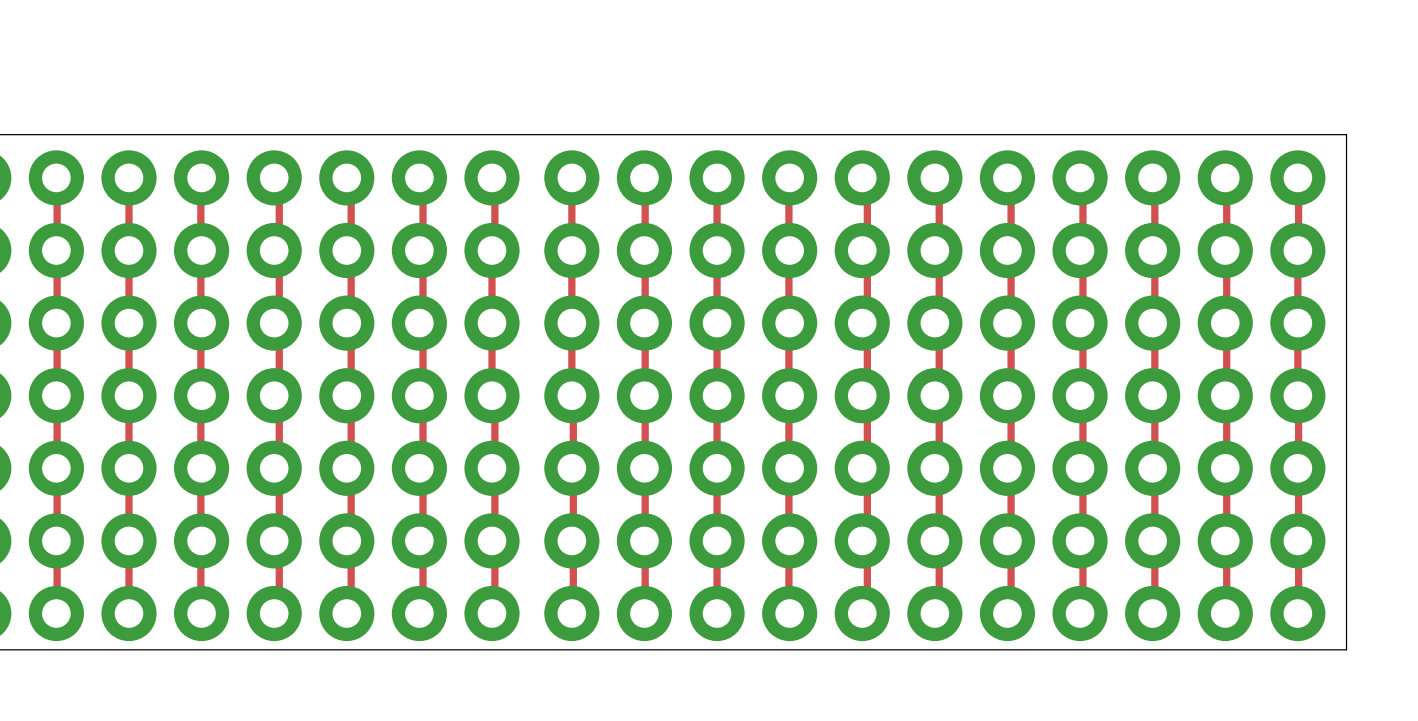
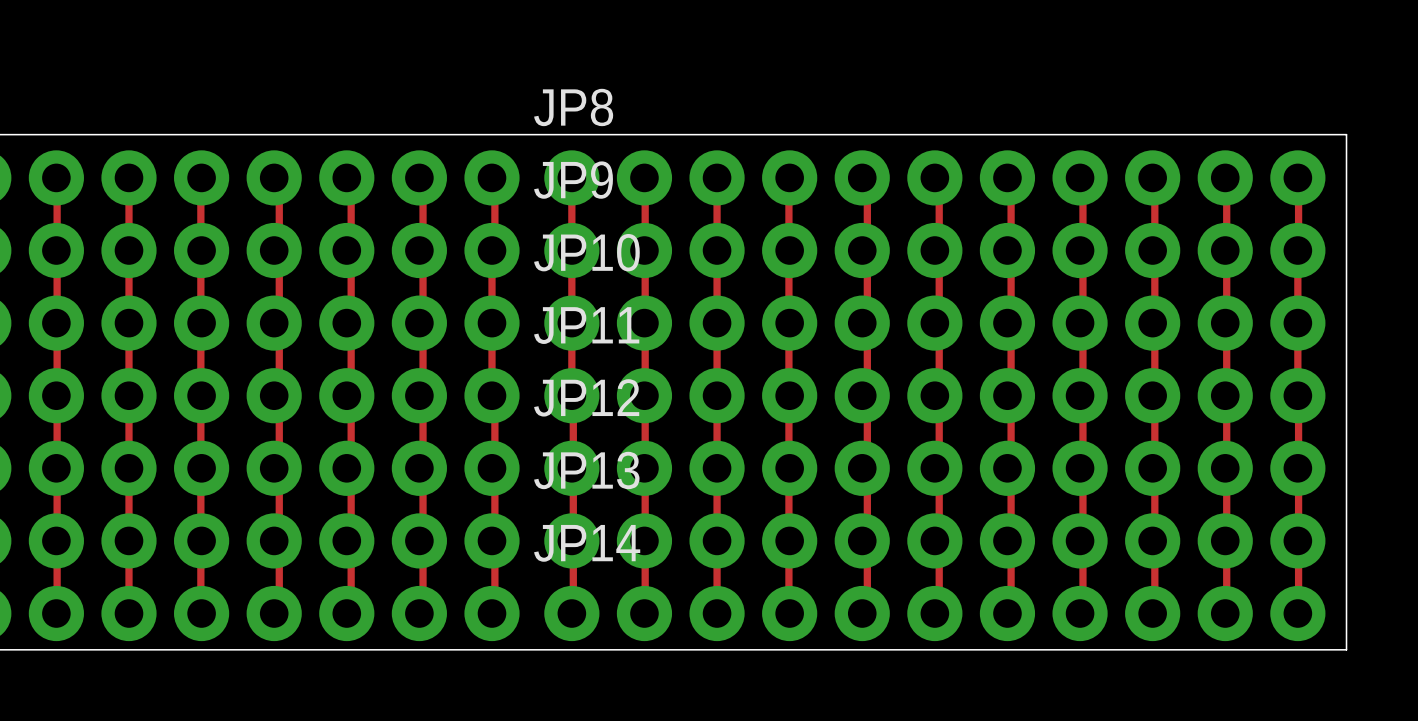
JP8 name: none -> JP8 (573, 107)
JP9 name: none -> JP9 (573, 180)
JP10 name: none -> JP10 (586, 252)
JP11 name: none -> JP11 (586, 325)
JP12 name: none -> JP12 (586, 397)
JP13 name: none -> JP13 (586, 470)
JP14 name: none -> JP14 (587, 543)

